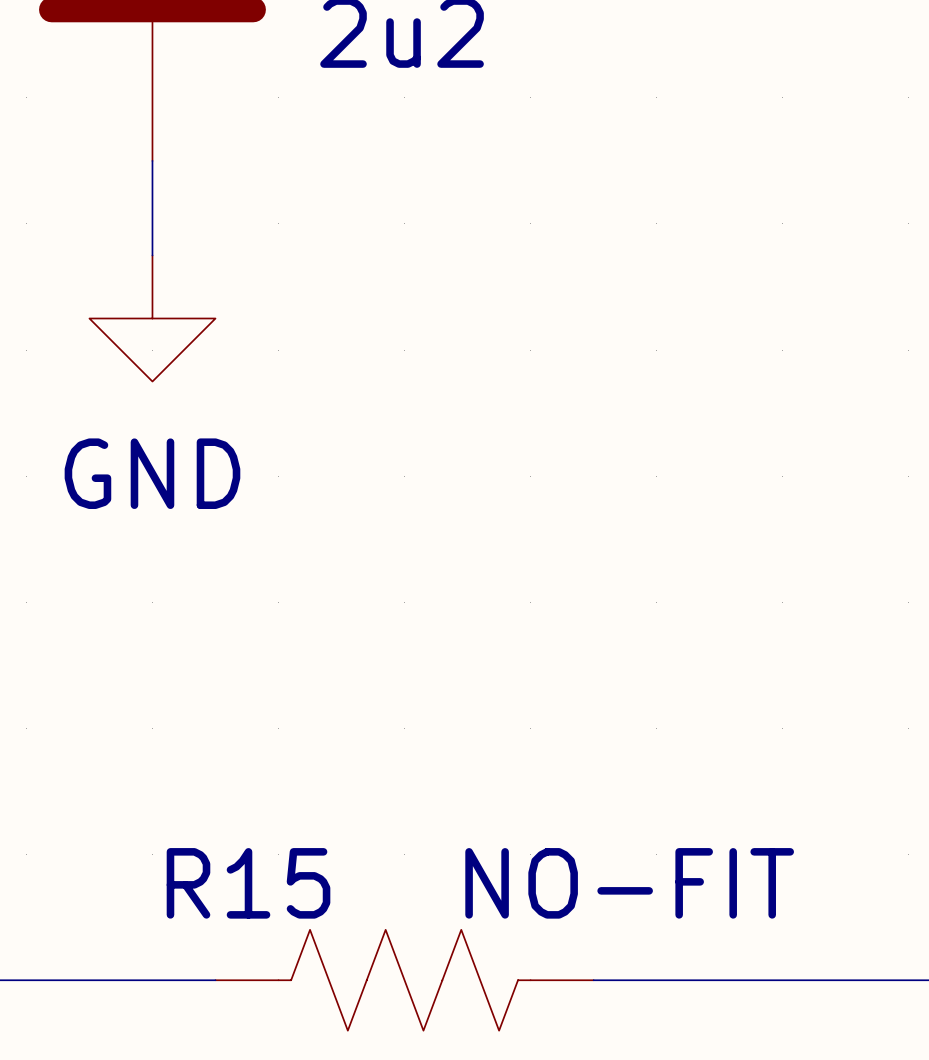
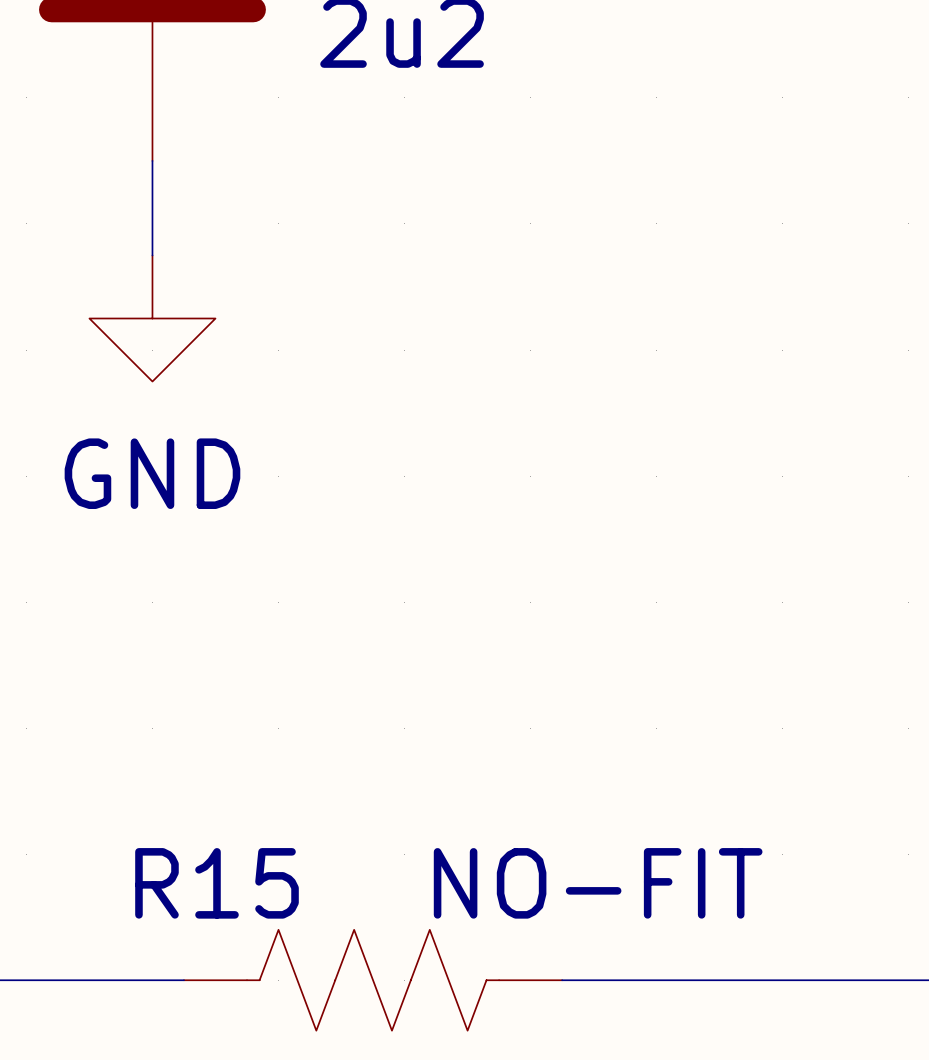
R15 position: (404, 980) -> (373, 980)

